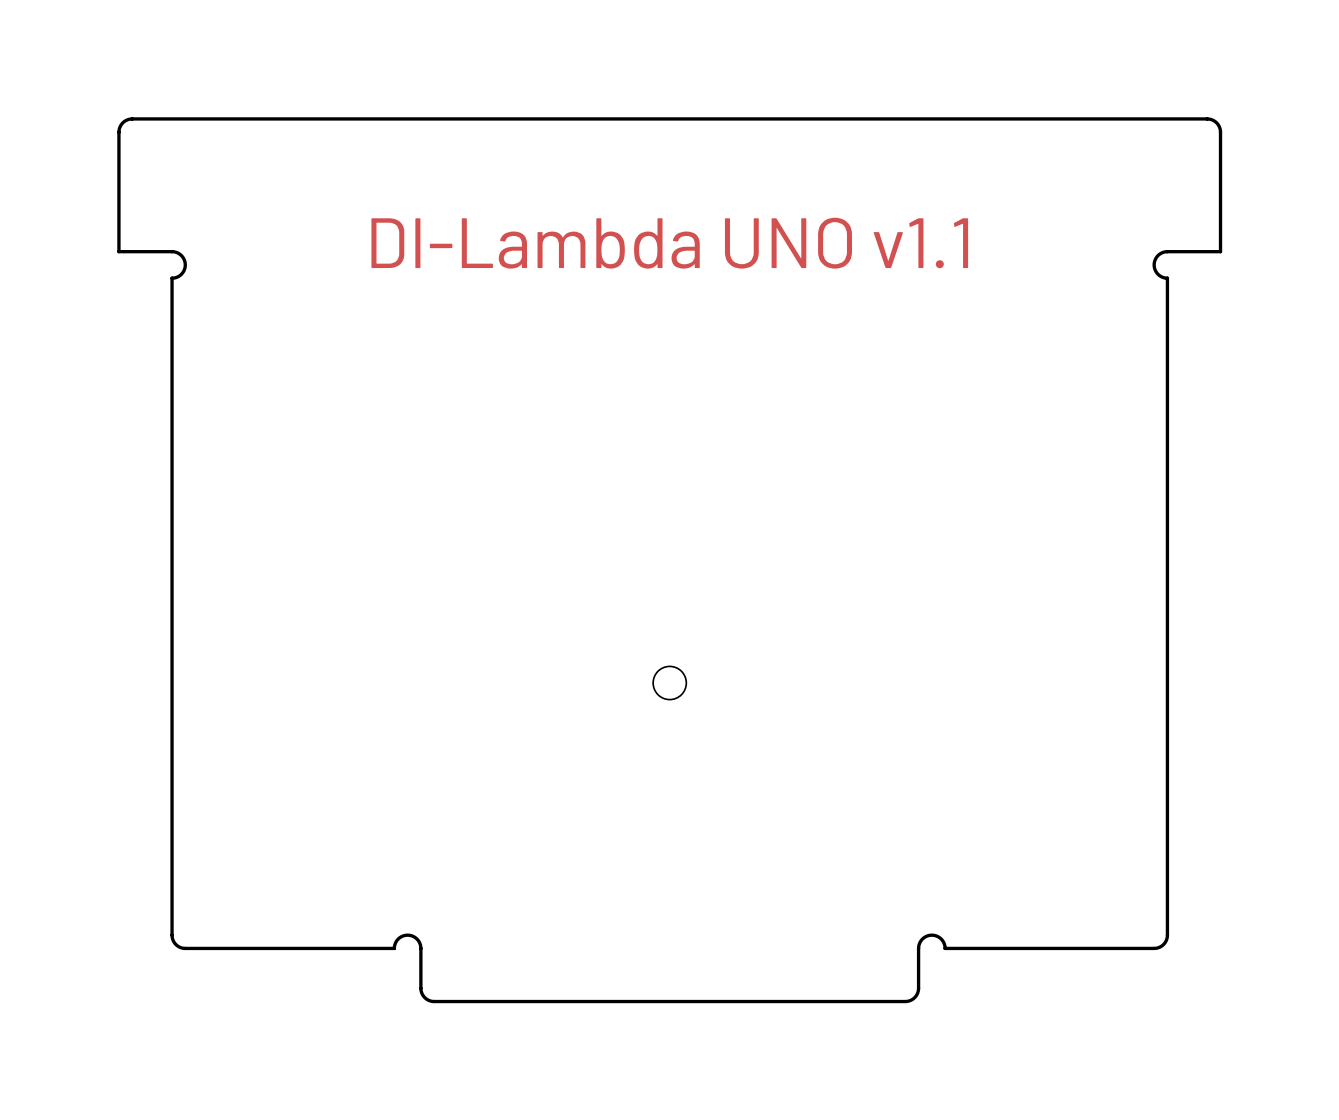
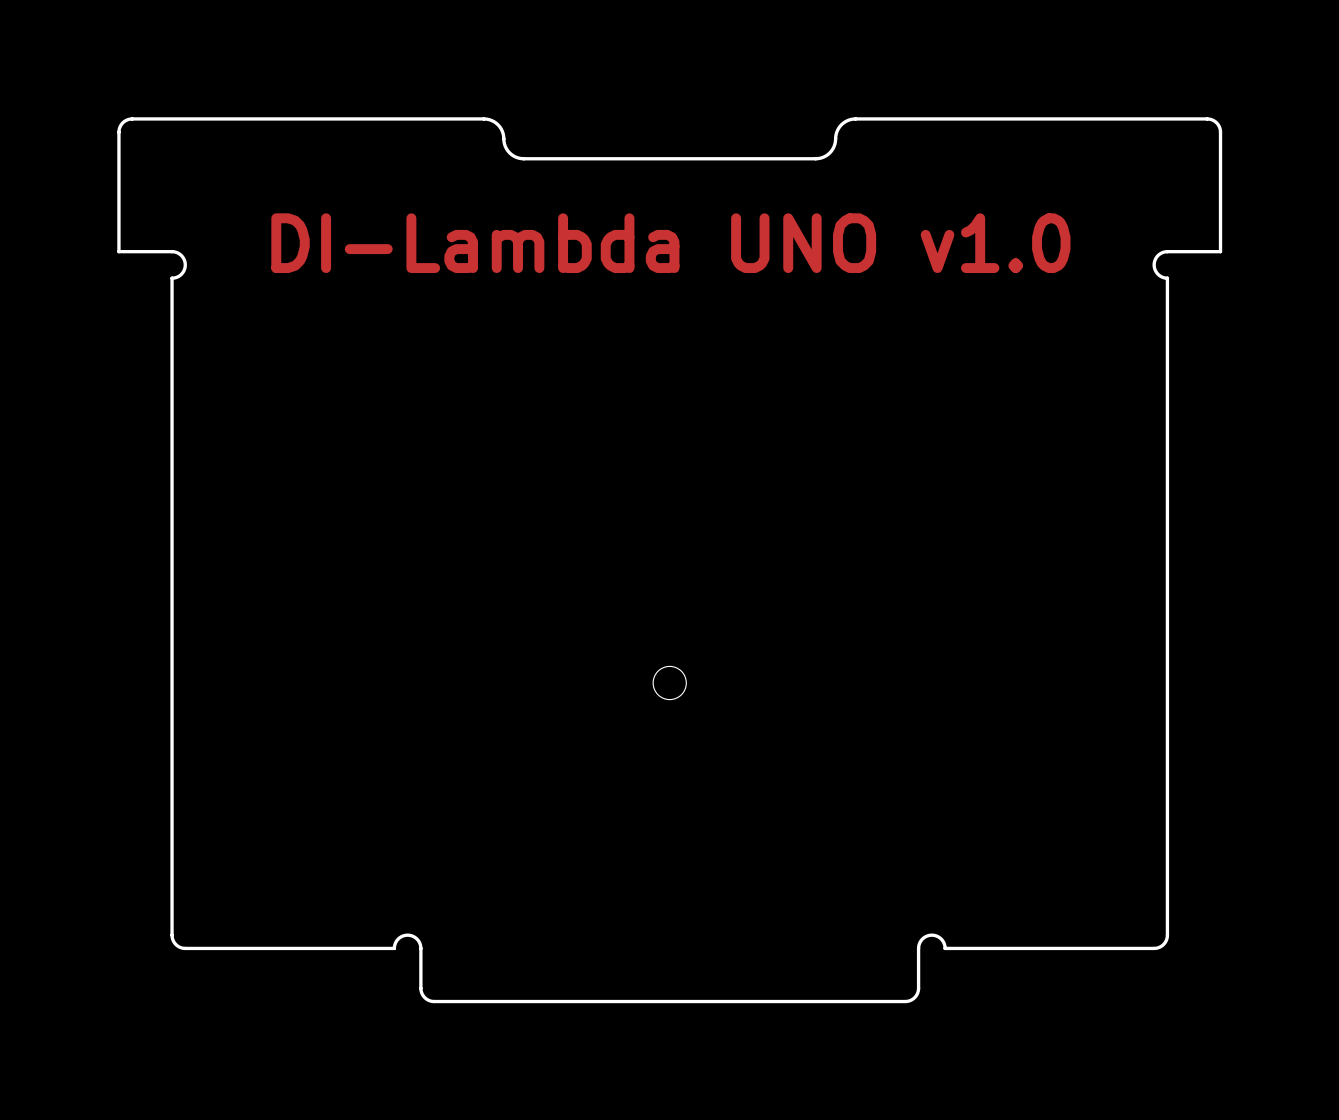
board edge: (483, 118) (855, 118) -> (483, 118) (491, 120) (499, 126) (505, 146) (509, 152) (516, 157) (523, 158) (818, 158) (825, 156) (831, 150) (837, 131) (841, 124) (847, 120) (855, 118)
text: DI-Lambda UNO v1.1 (669, 243) -> DI-Lambda UNO v1.0 (670, 243)

